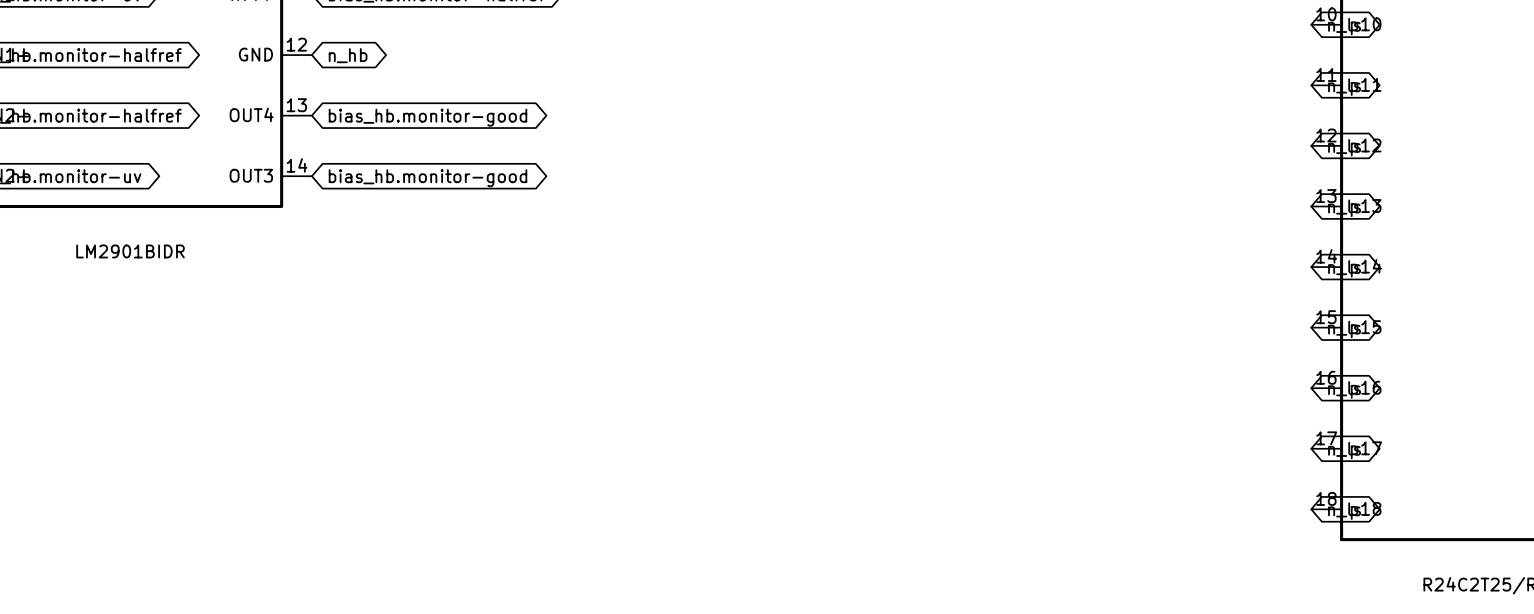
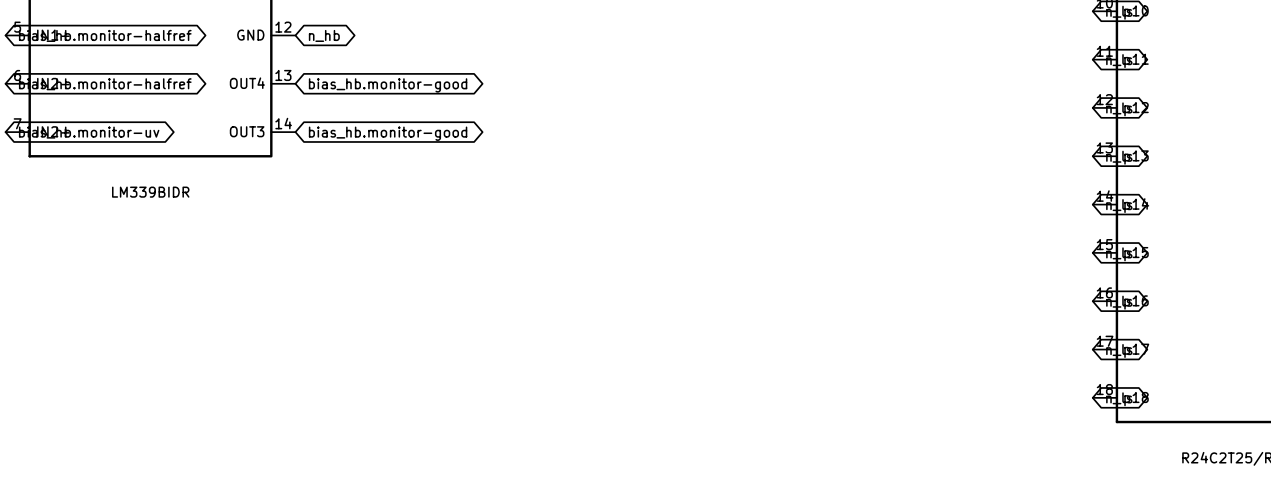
part value: LM2901BIDR (130, 251) -> LM339BIDR (150, 192)

